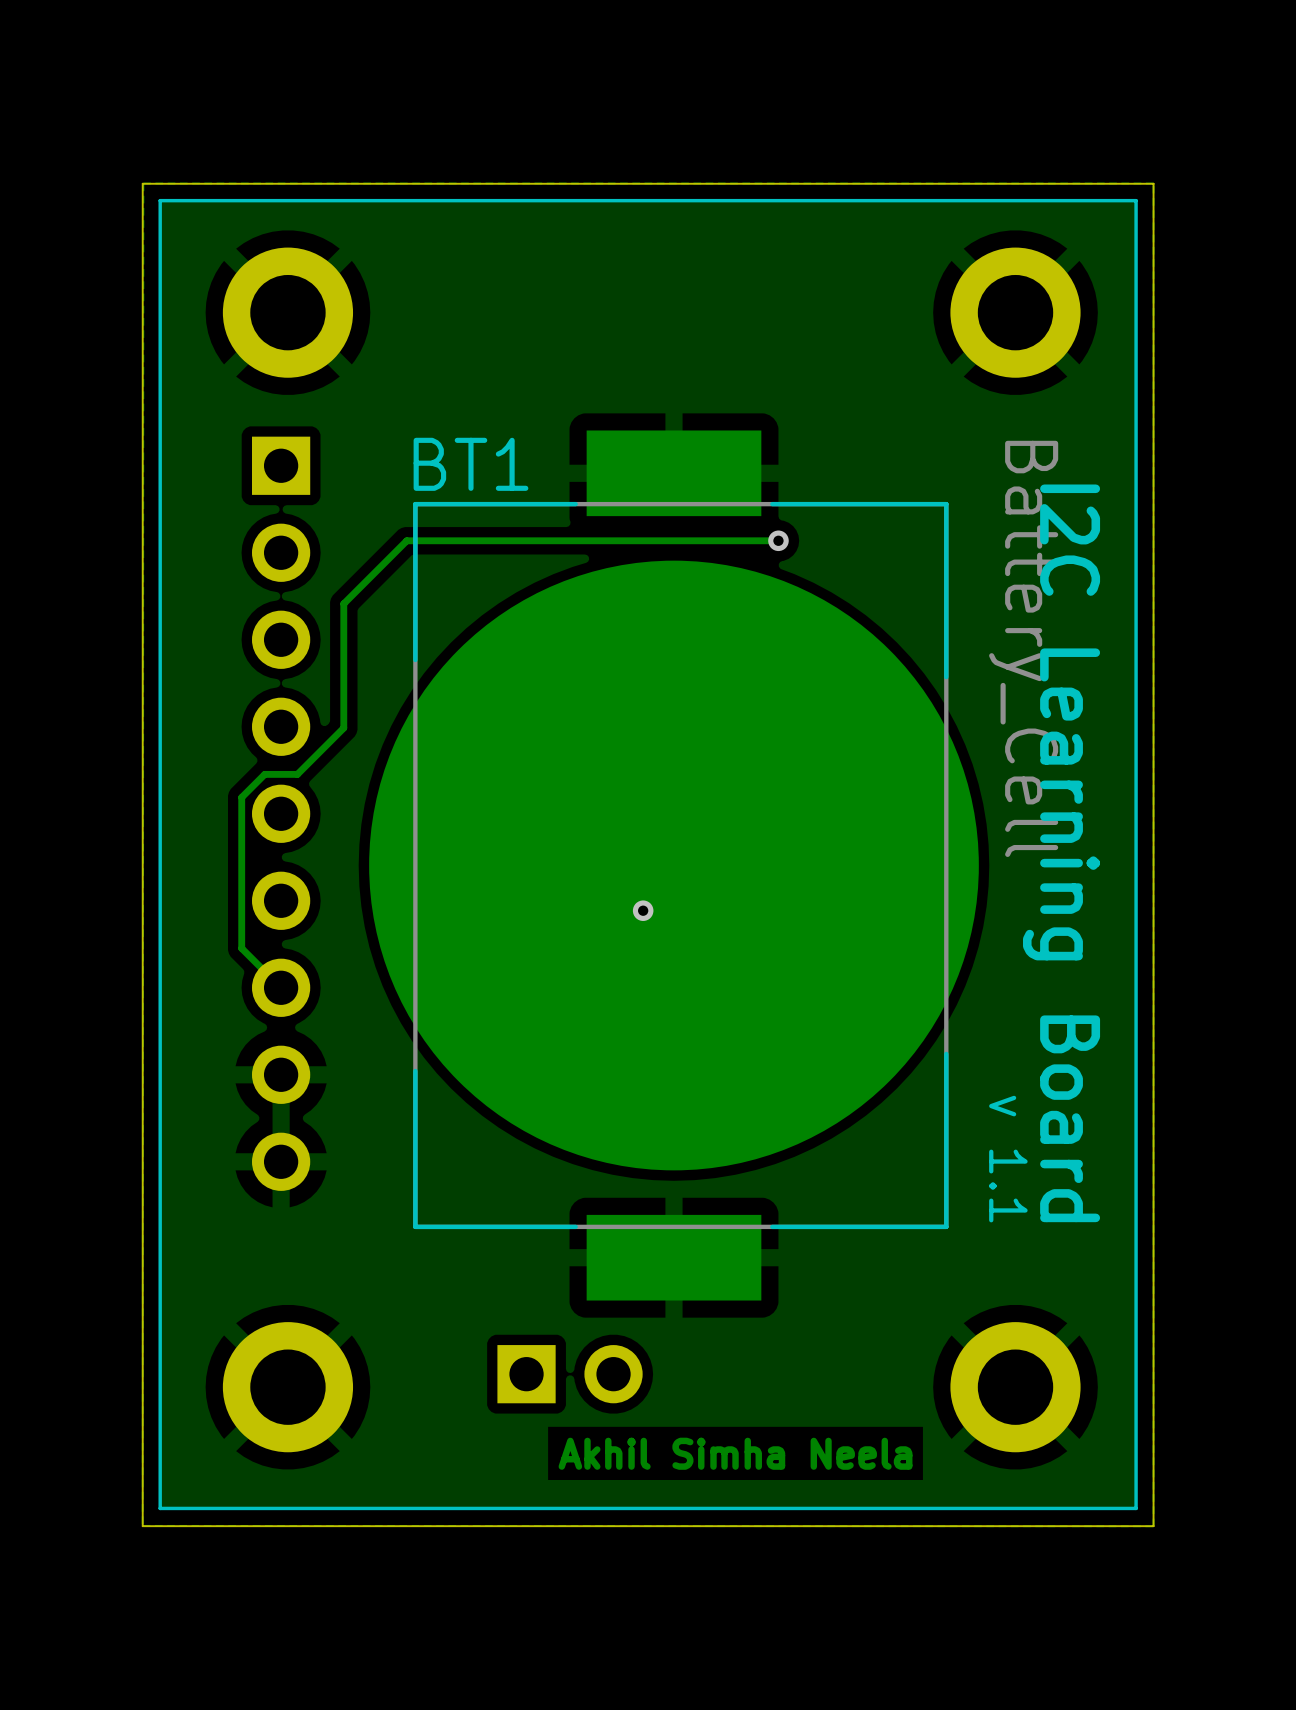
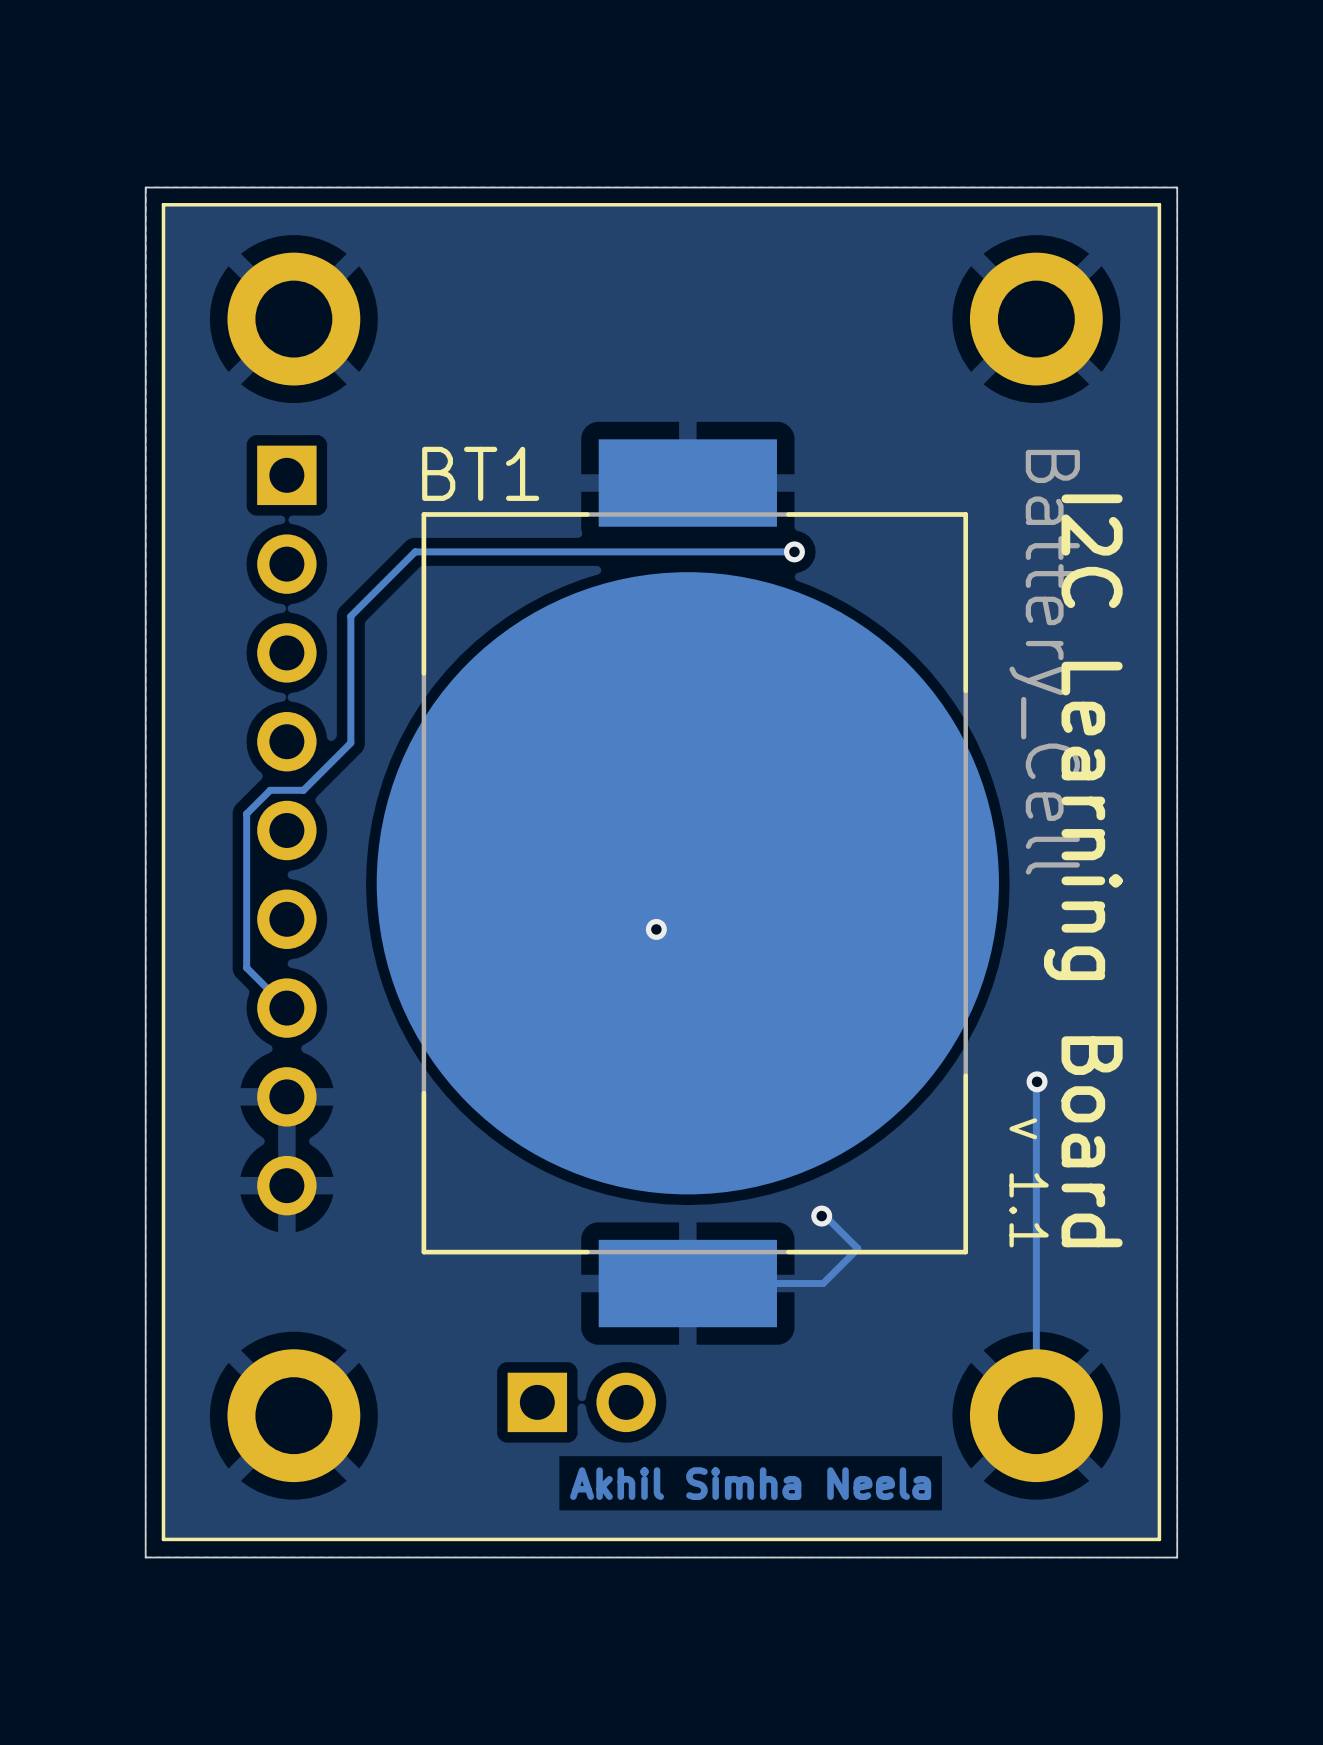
track: none -> (1037, 1081) (1036, 1415)
via: none -> (1037, 1081)
track: none -> (821, 1216) (825, 1216) (857, 1248)
via: none -> (821, 1216)
track: none -> (857, 1248) (823, 1283) (687, 1283)

